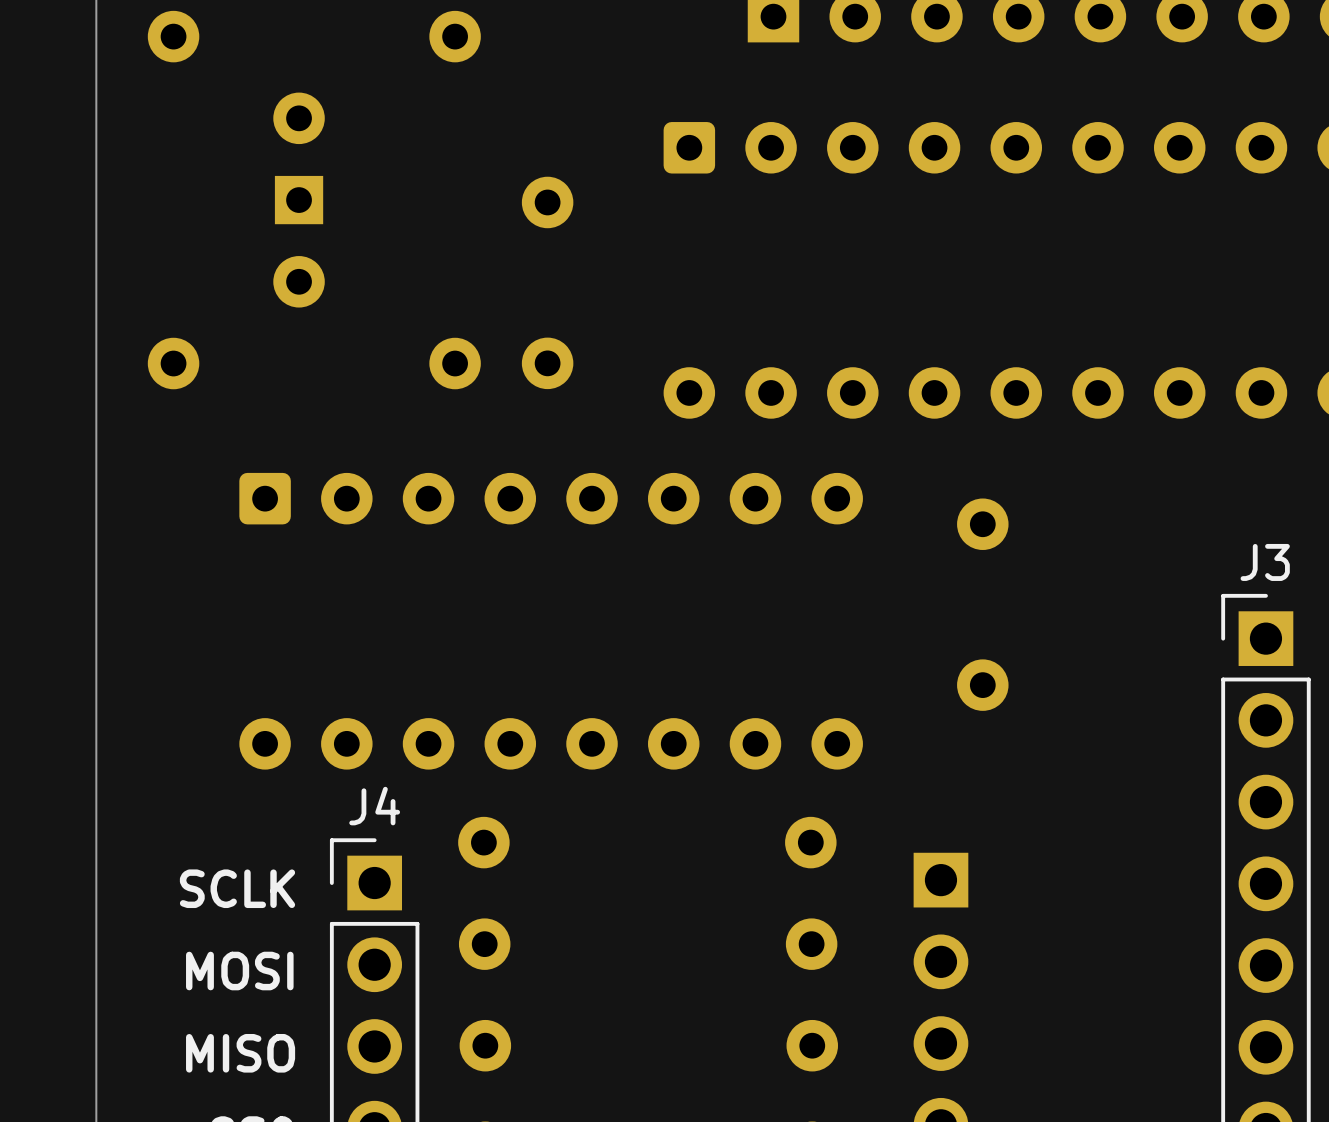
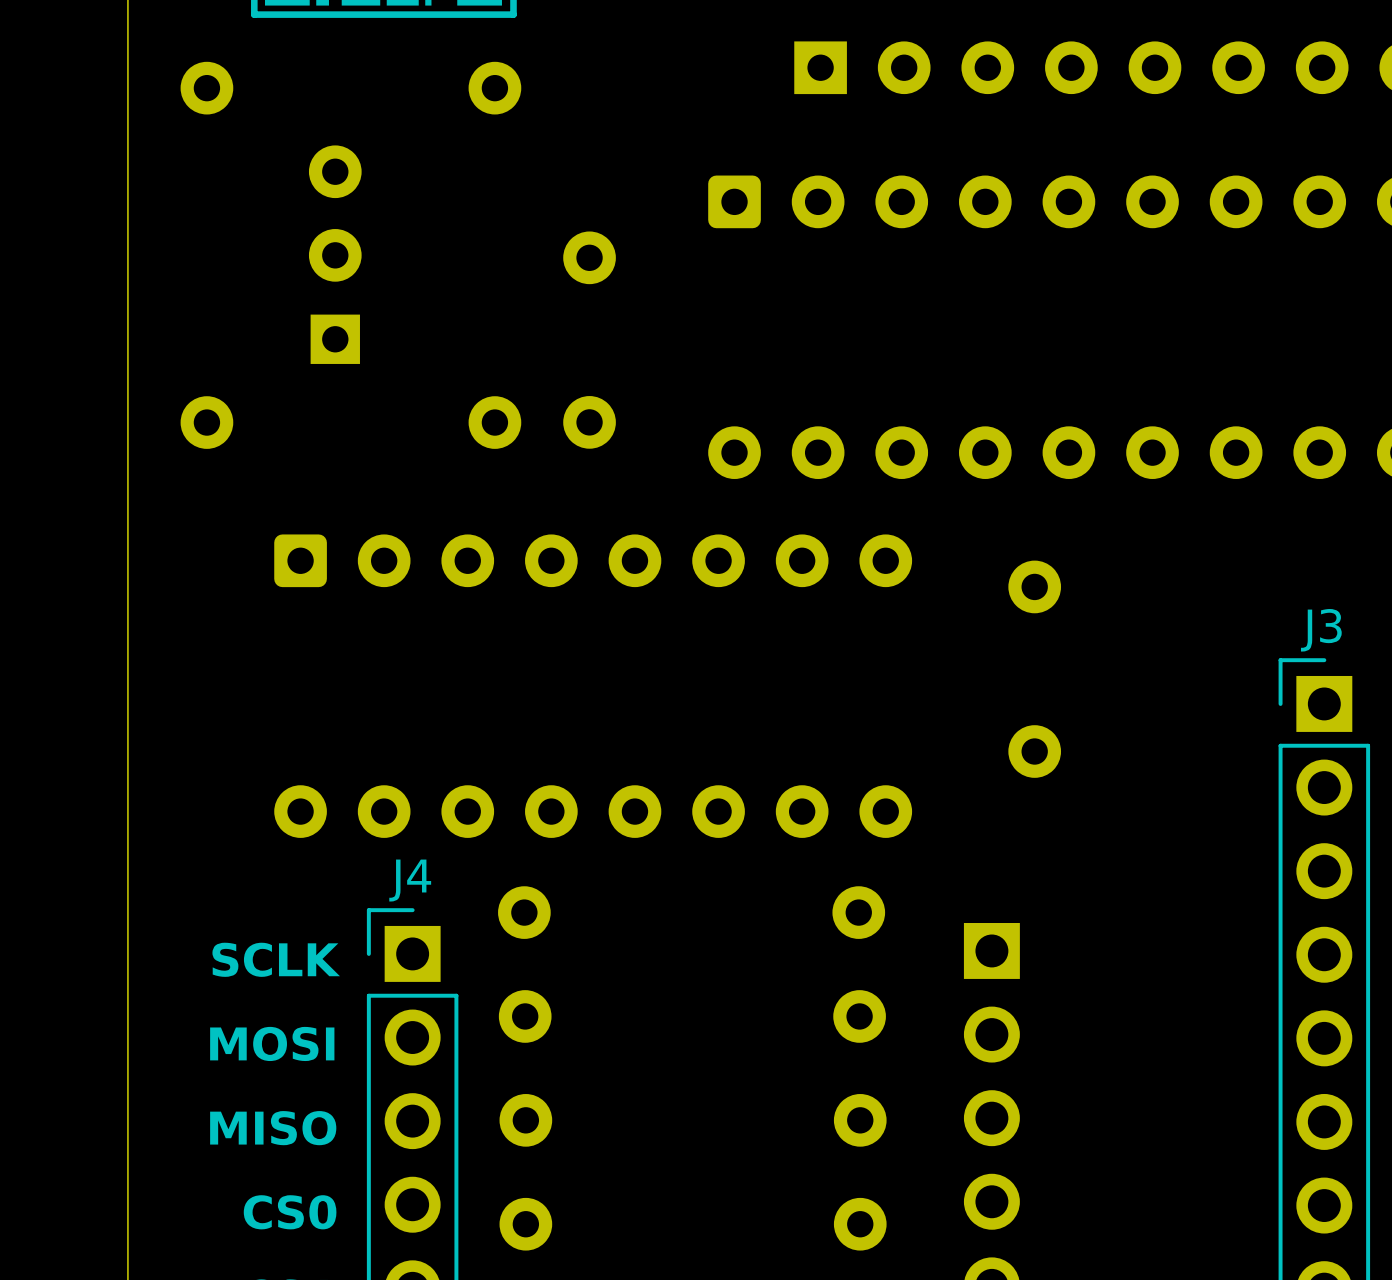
part footprint: [273, 92, 325, 308] -> [308, 145, 362, 364]

